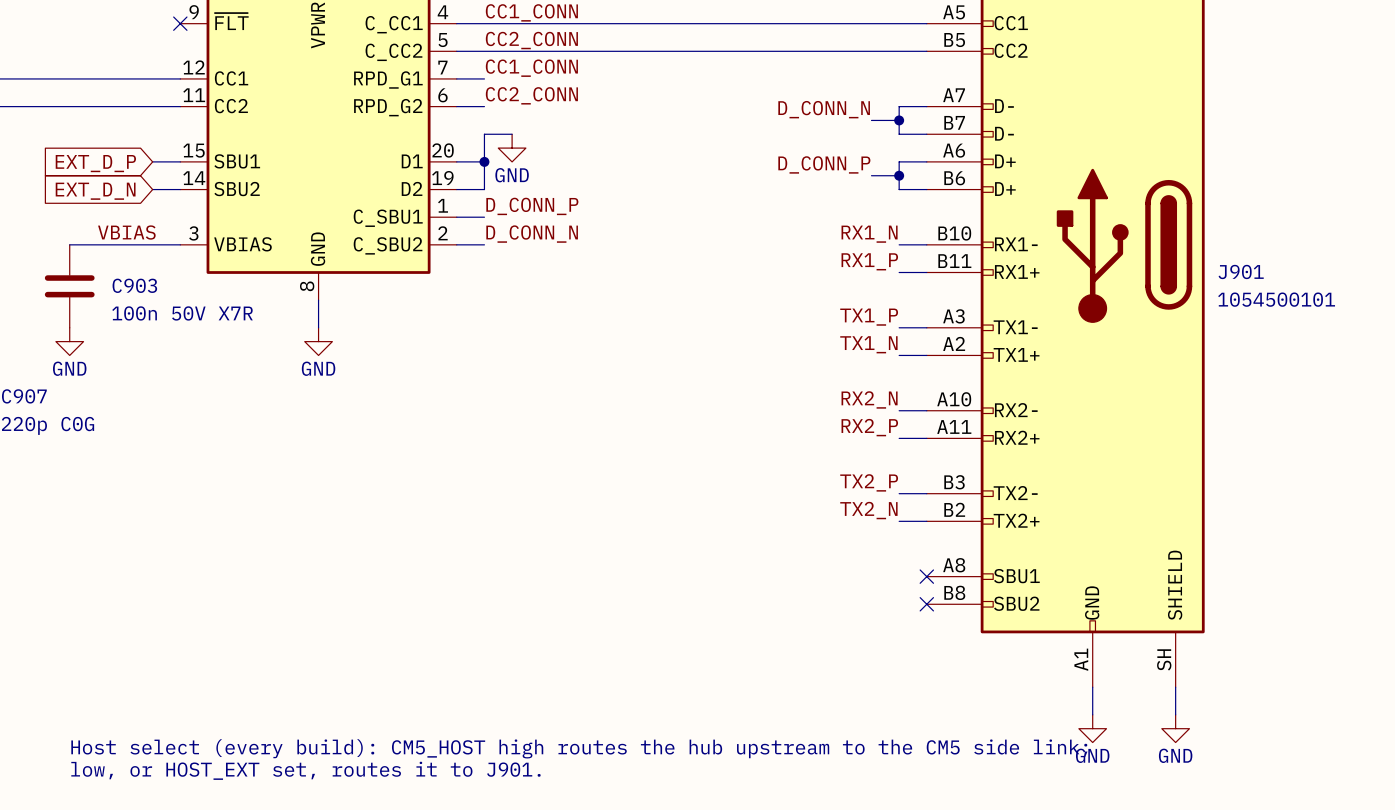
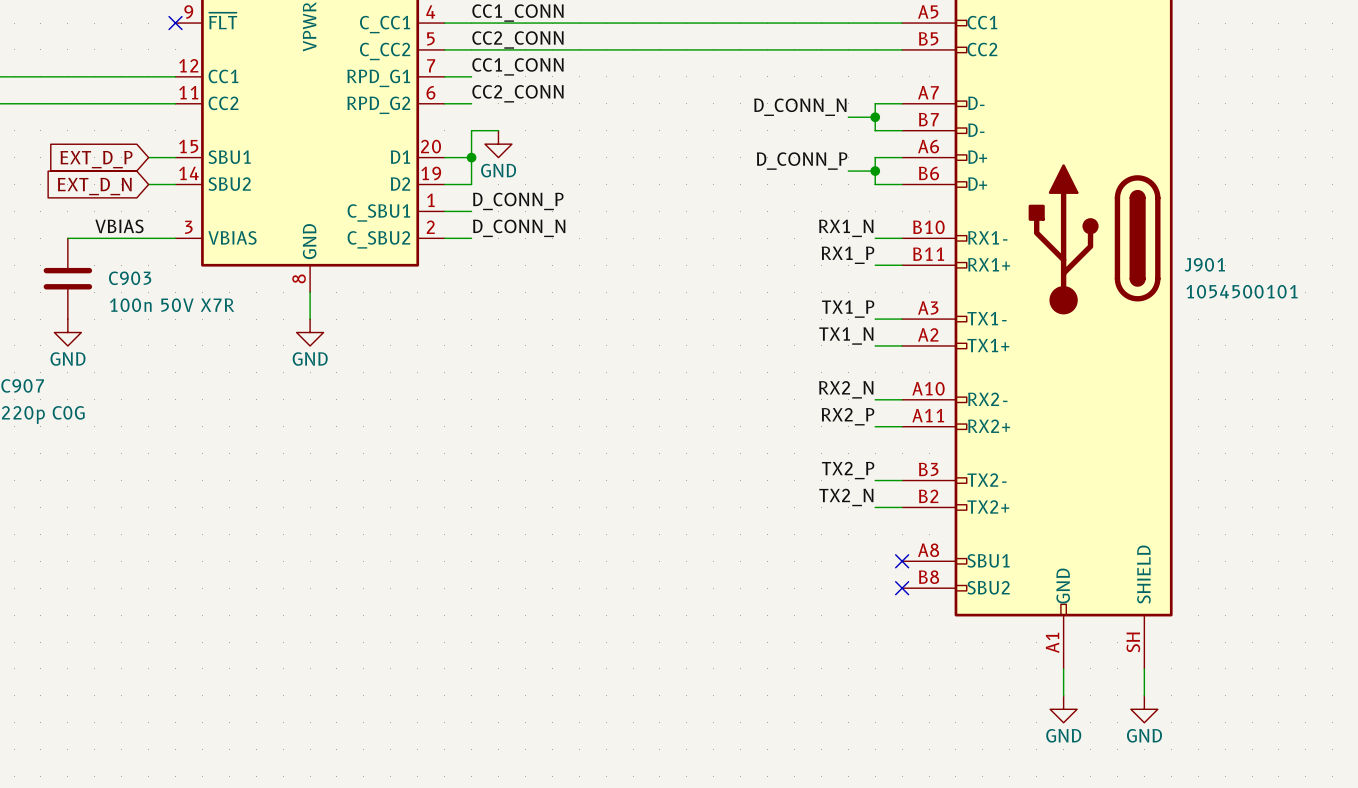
text: Host select (every build): CM5_HOST high routes the hub upstream to the CM5 side link; (579, 748) -> none
text: low, or HOST_EXT set, routes it to J901. (305, 770) -> none

